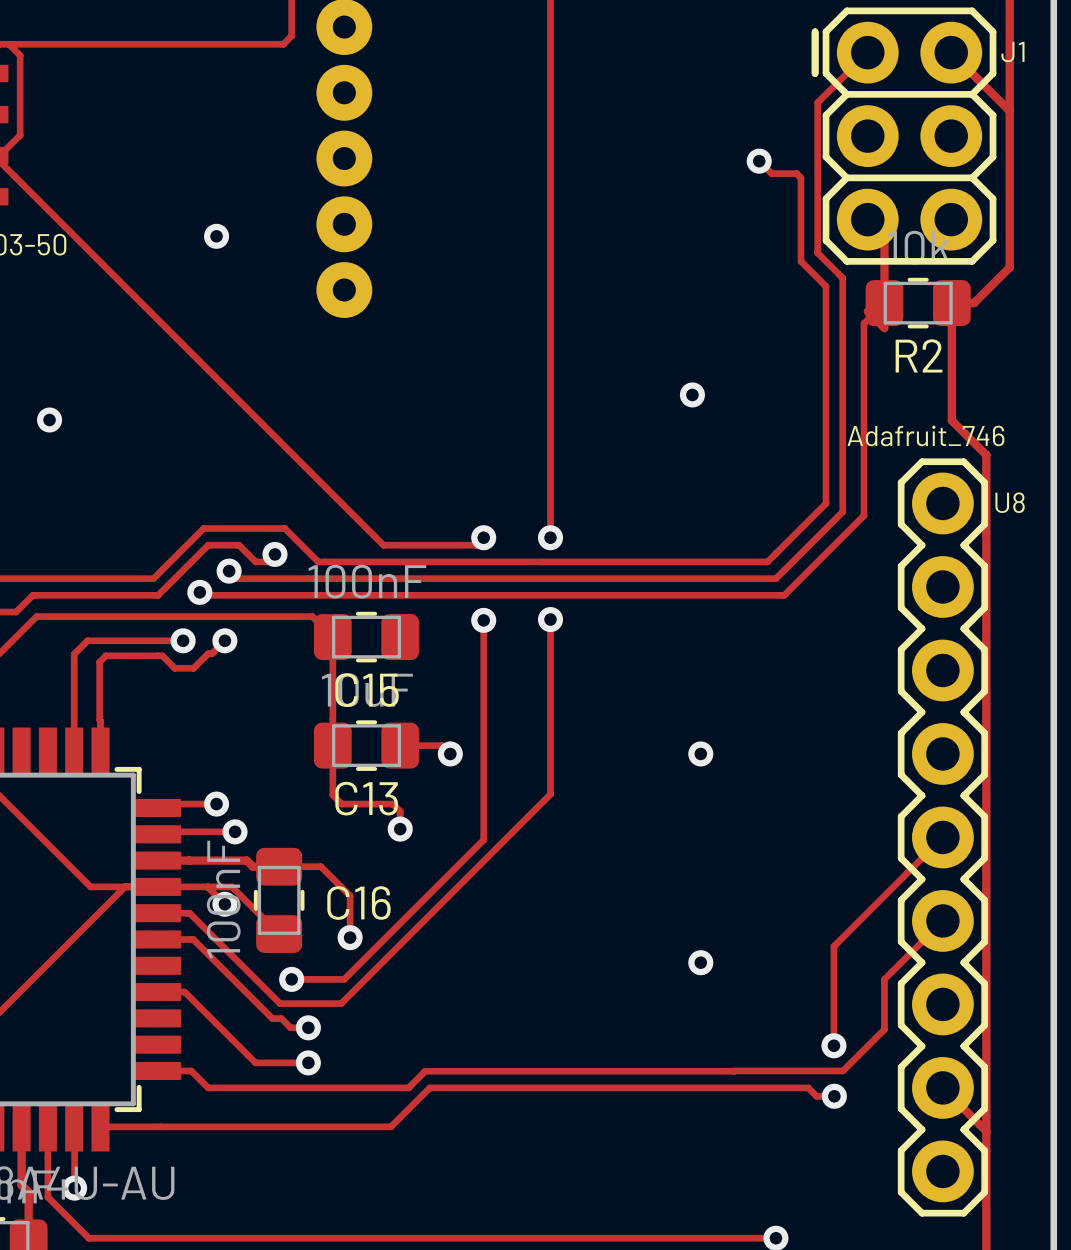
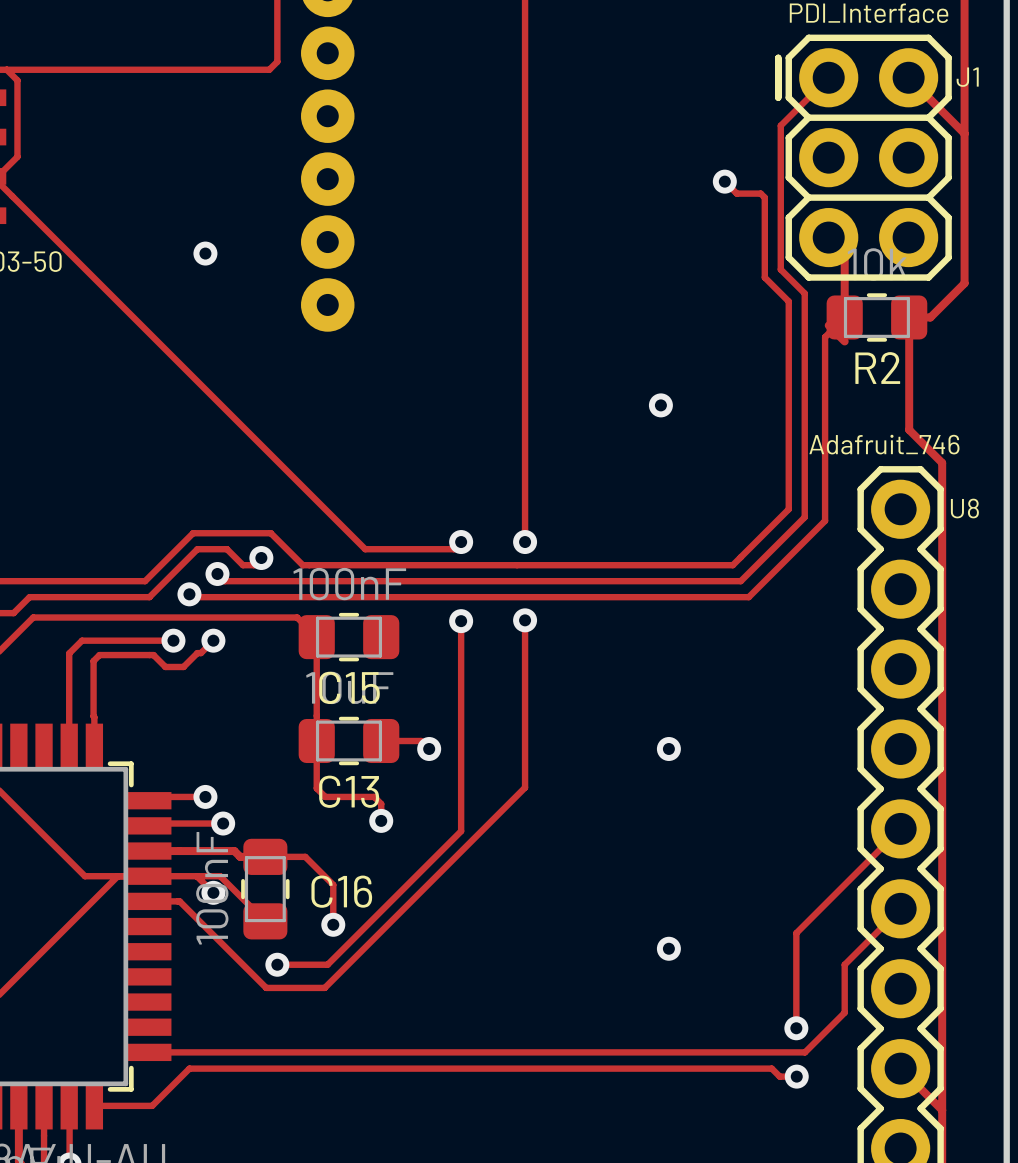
via: (49, 420) -> none
track: (156, 939) (193, 939) (272, 1018) (281, 1018) (290, 1027) (308, 1027) -> none
track: (156, 992) (184, 992) (255, 1062) (308, 1062) -> none
via: (308, 1027) -> none
via: (308, 1062) -> none
track: (191, 1070) (208, 1087) -> (152, 1105) (189, 1068) (197, 1068)
track: (734, 1071) (425, 1071) (408, 1087) -> (701, 1052) (181, 1052)
track: (429, 1087) (390, 1126) (160, 1126) -> (409, 1068) (389, 1068)

